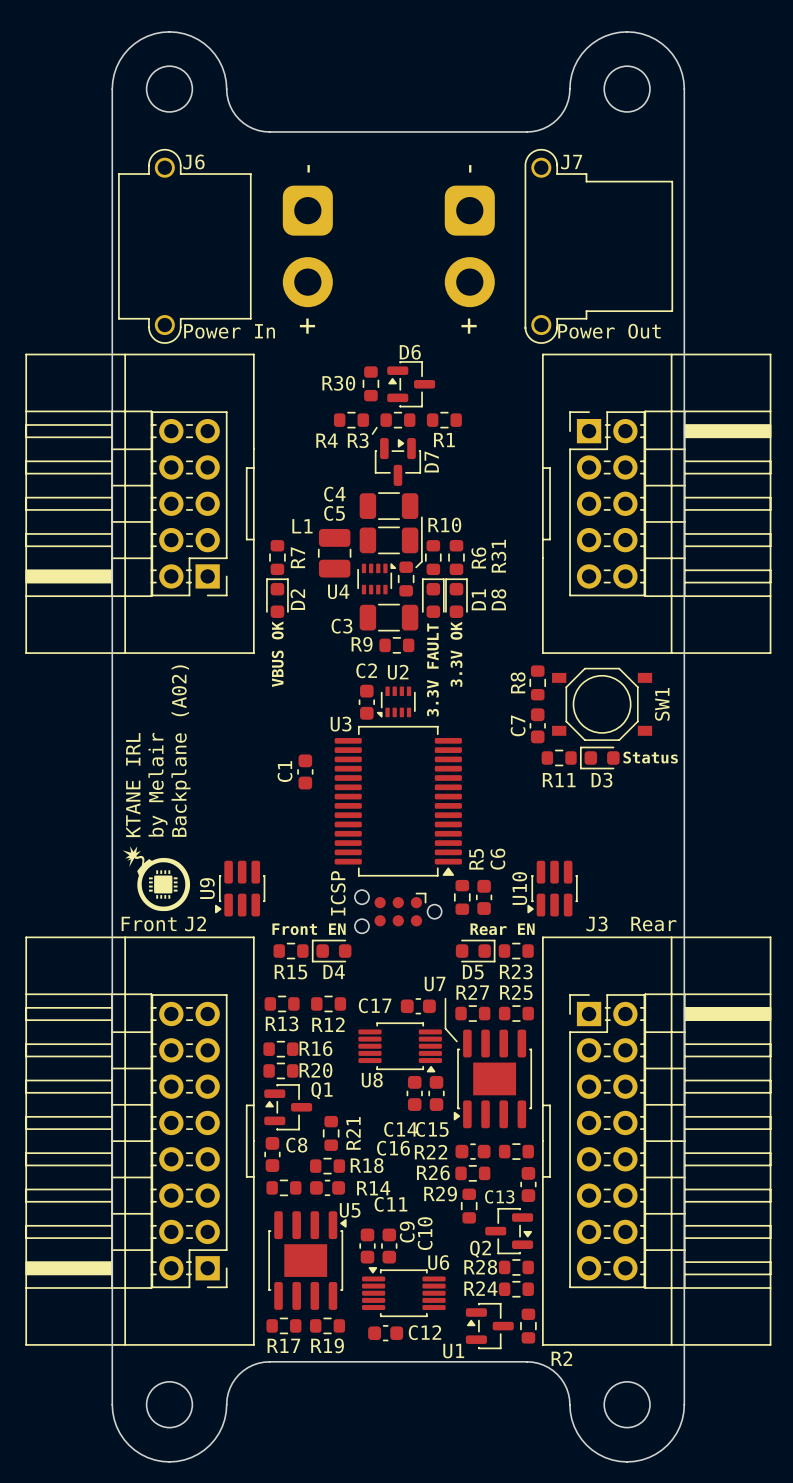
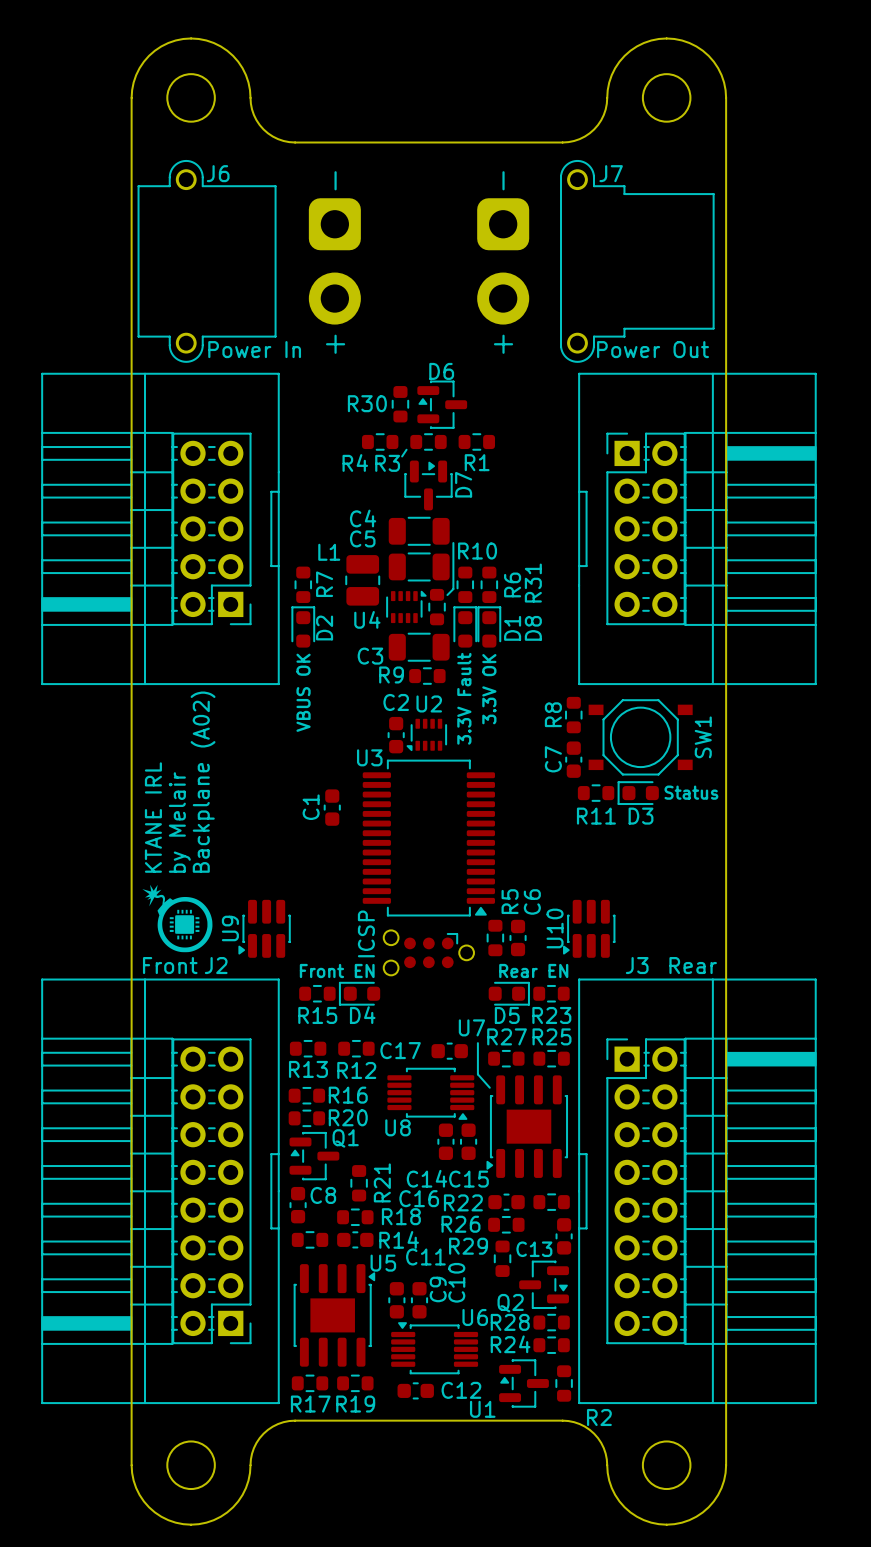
text: 3.3V FAULT (432, 669) -> 3.3V Fault (464, 698)

